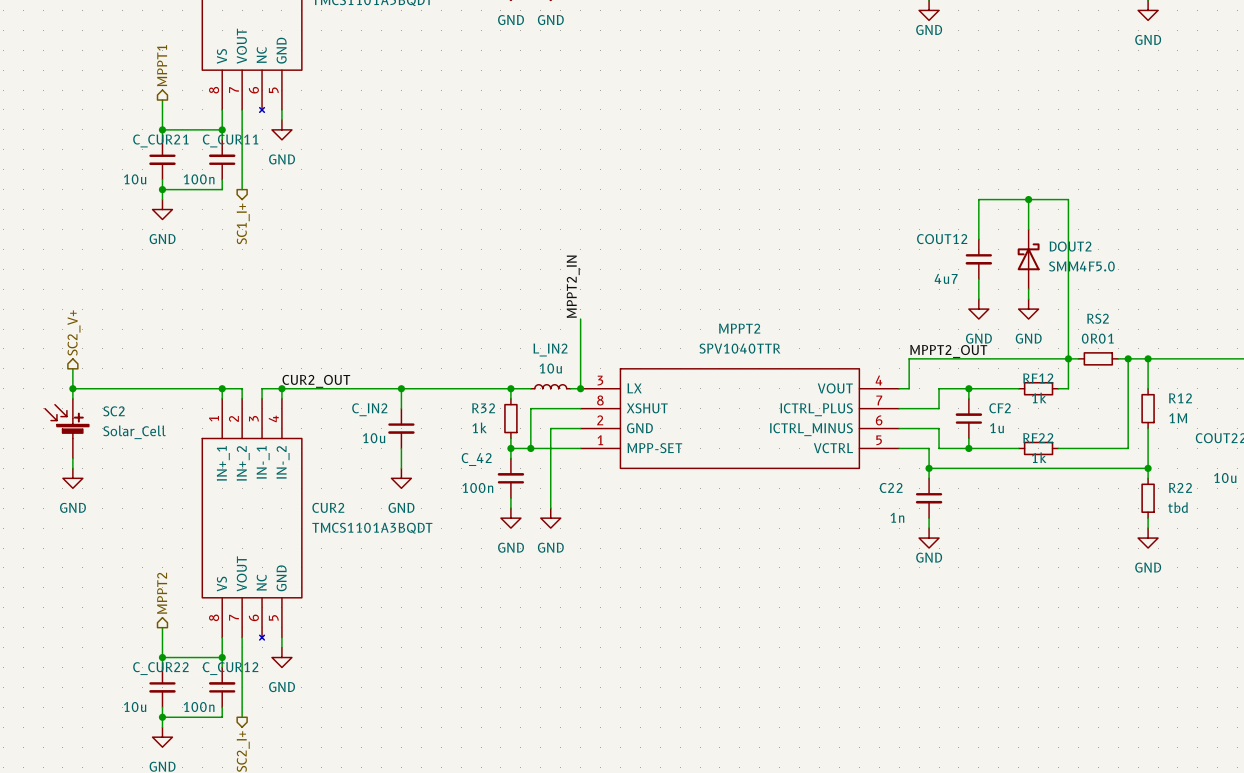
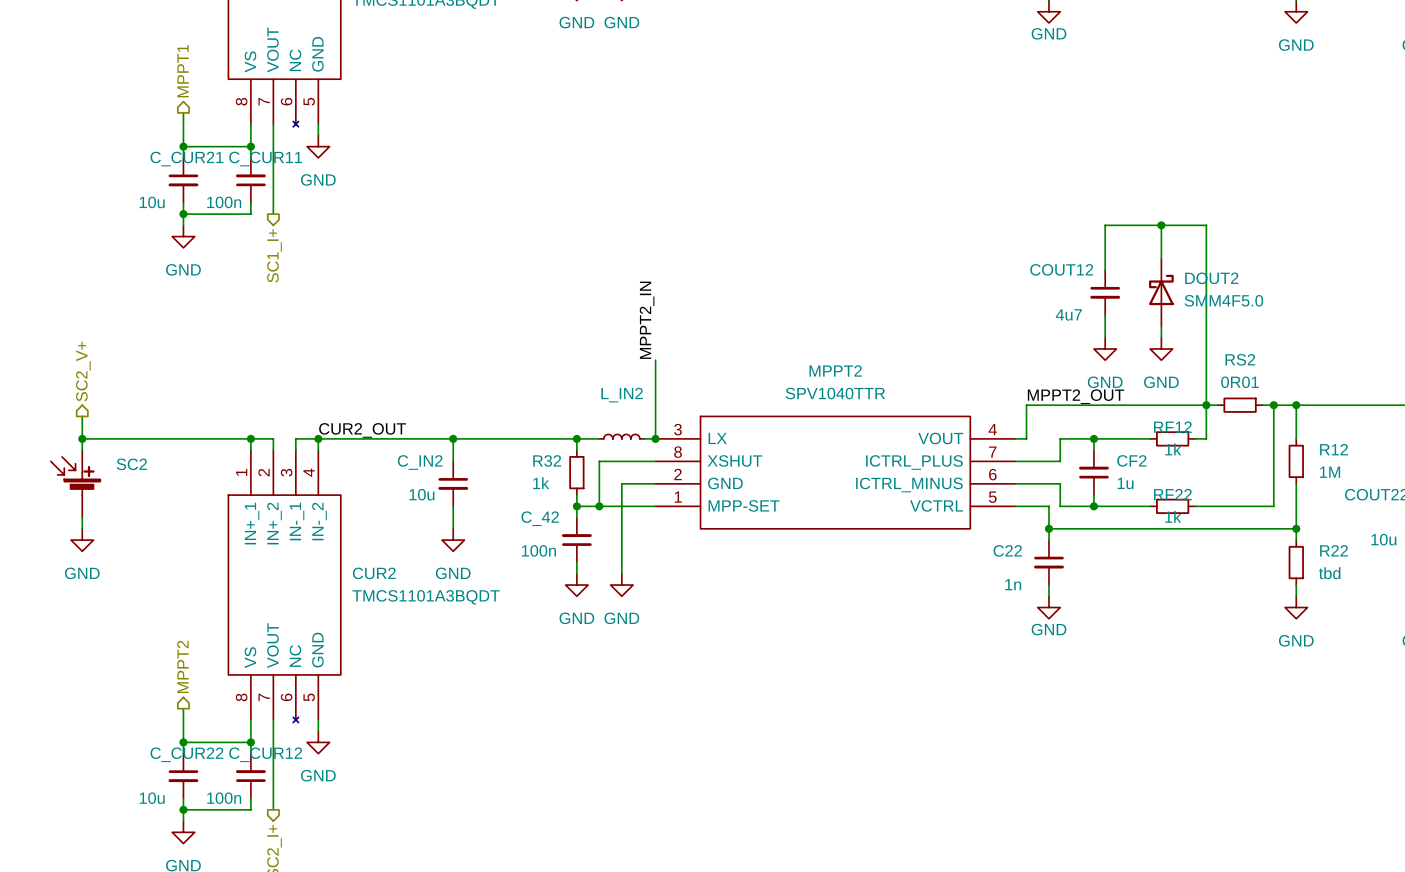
L_IN2 value: 10u (550, 368) -> none
SC2 value: Solar_Cell (134, 432) -> none

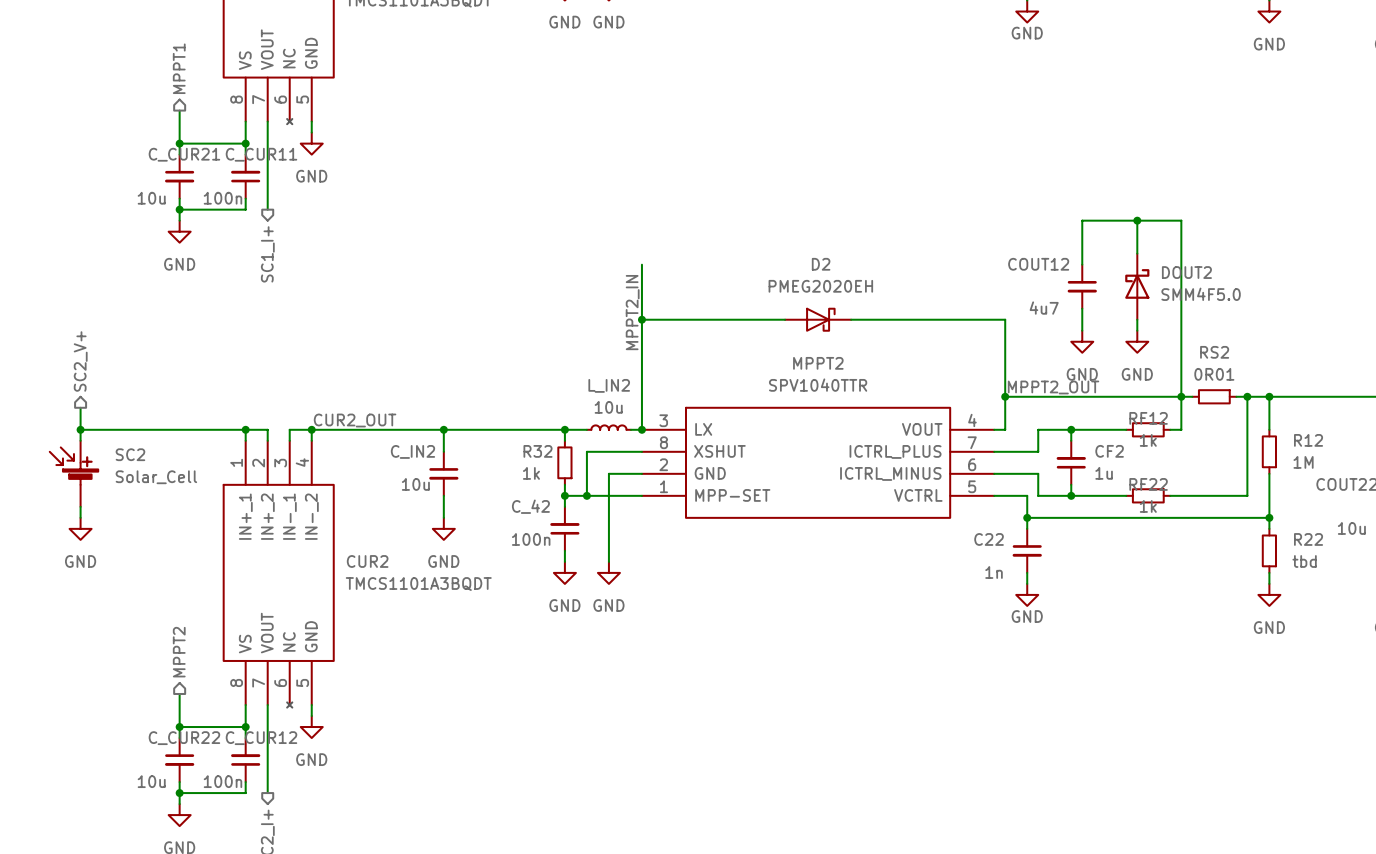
wire: none -> (641, 264) (641, 352)
wire: none -> (641, 319) (785, 319)
junction: none -> (641, 319)
D2: none -> PMEG2020EH (818, 319)
wire: none -> (851, 319) (1005, 319) (1005, 396)
junction: none -> (1005, 396)
L_IN2 value: none -> 10u (608, 407)
SC2 value: none -> Solar_Cell (156, 477)

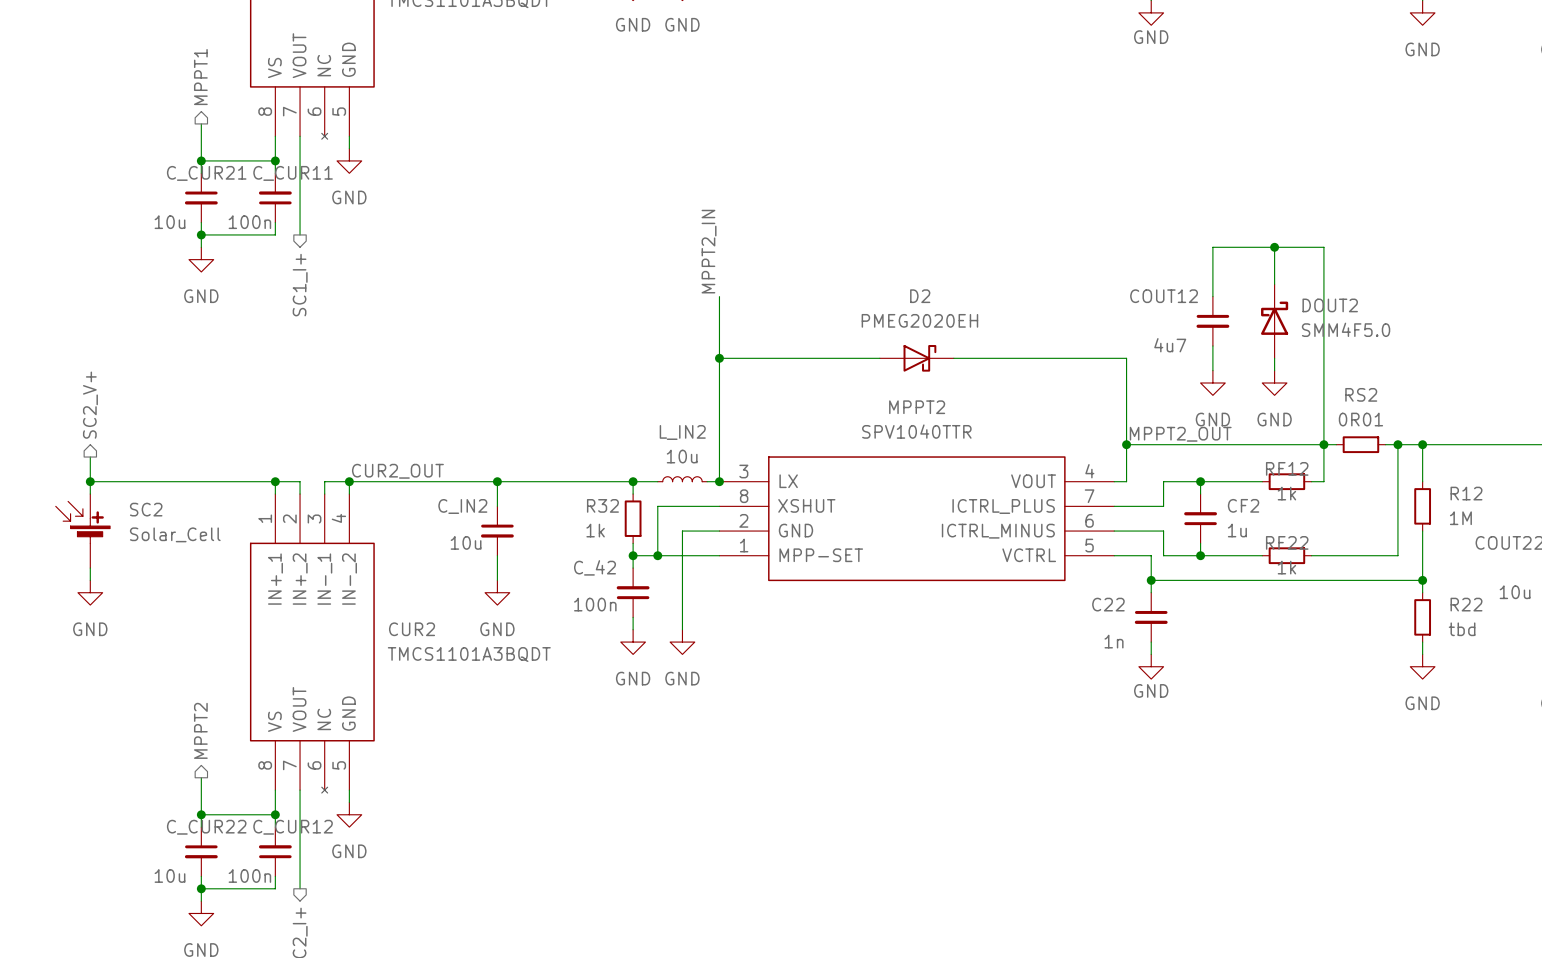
label position: MPPT2_IN (632, 312) -> MPPT2_IN (709, 251)

